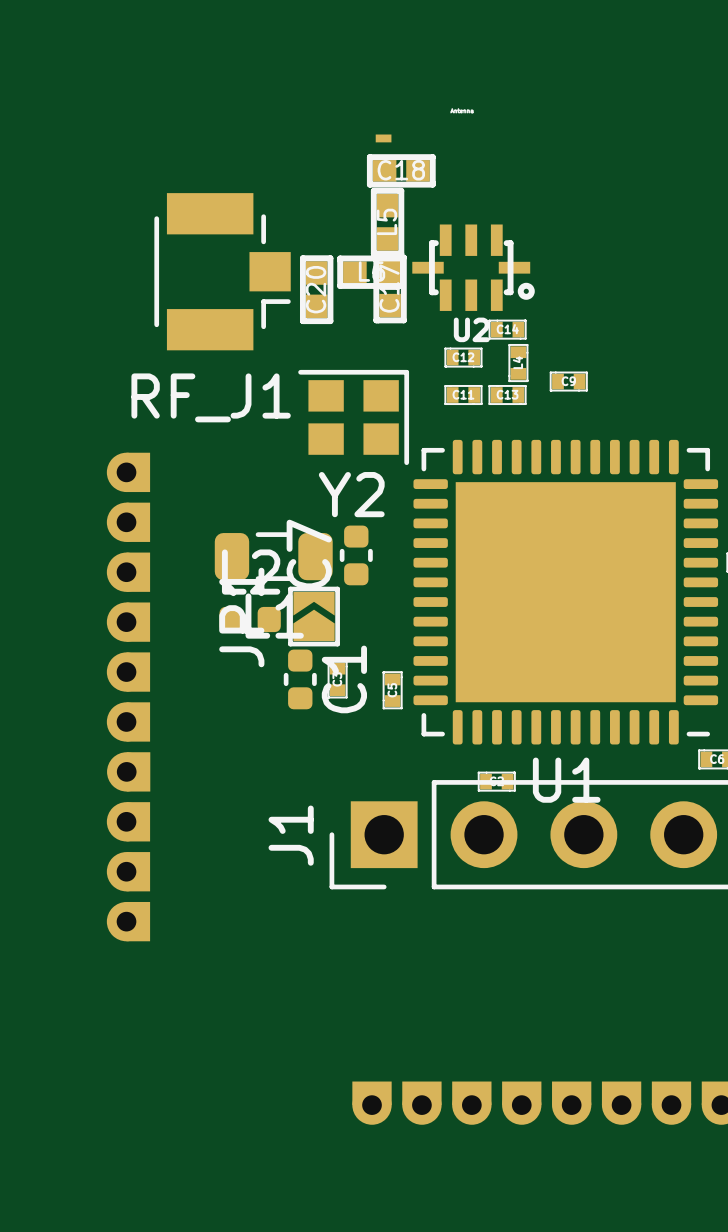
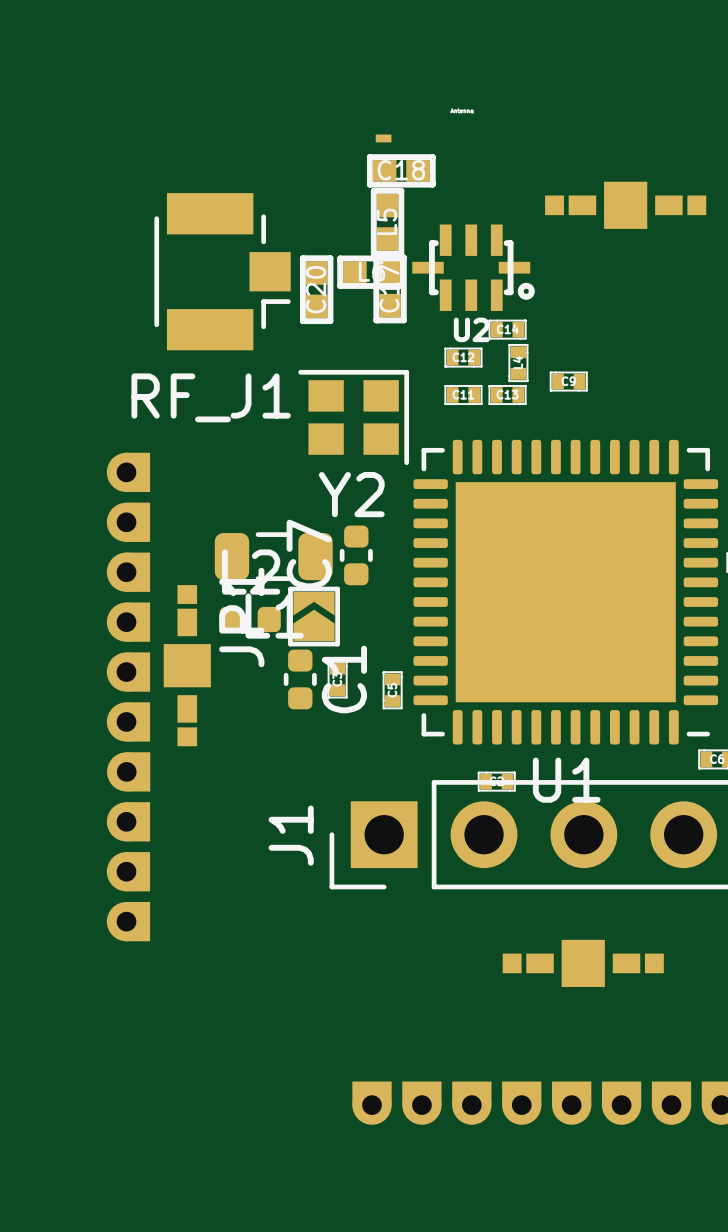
part: none -> (625, 205)
part: none -> (187, 665)
part: none -> (583, 963)

